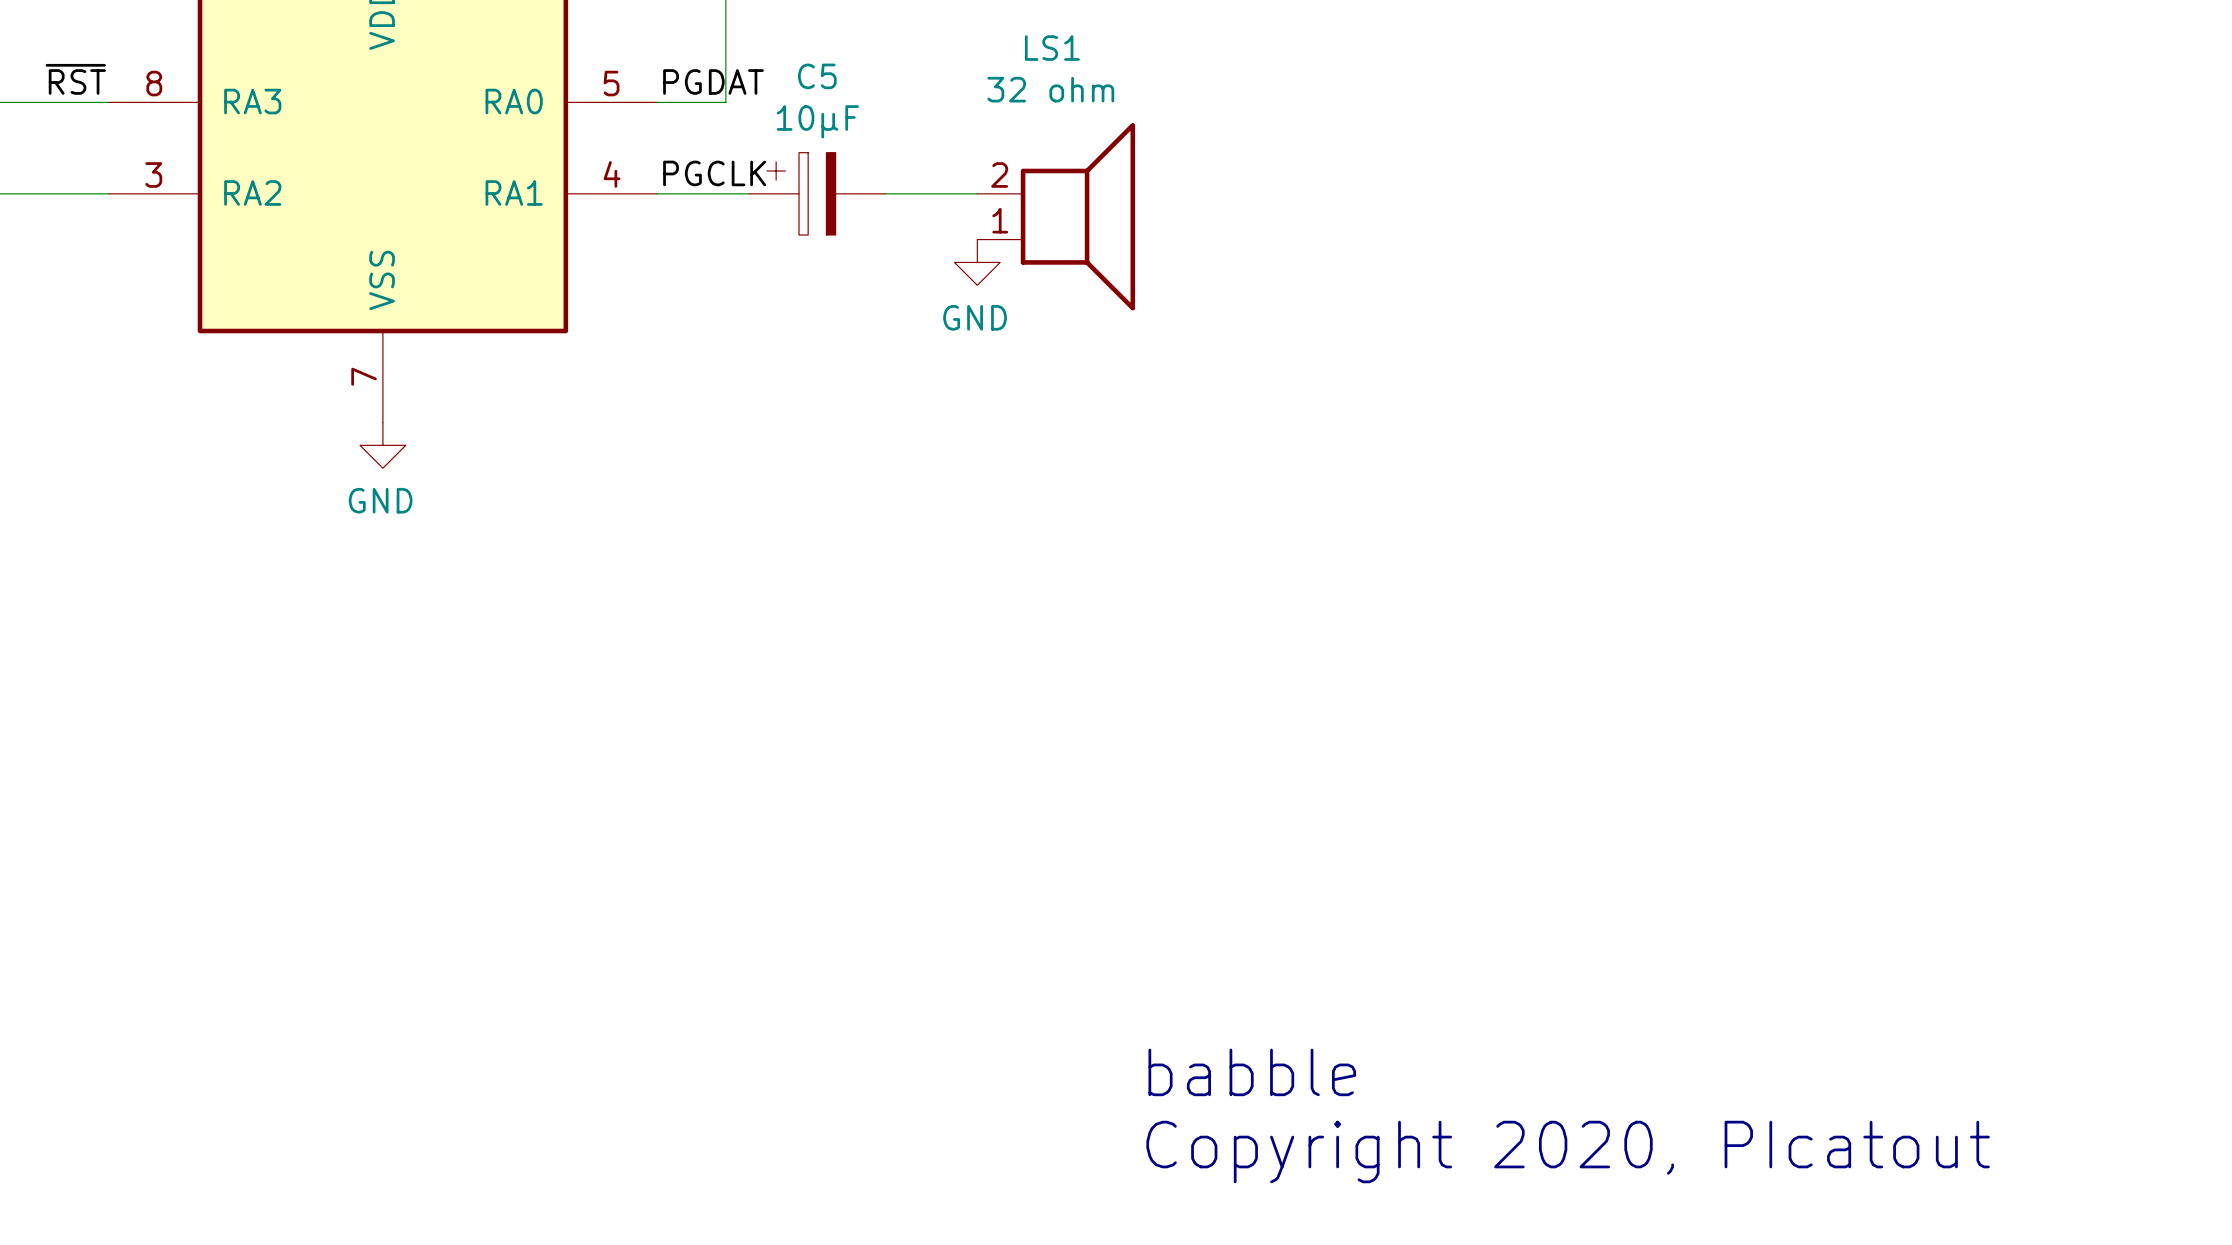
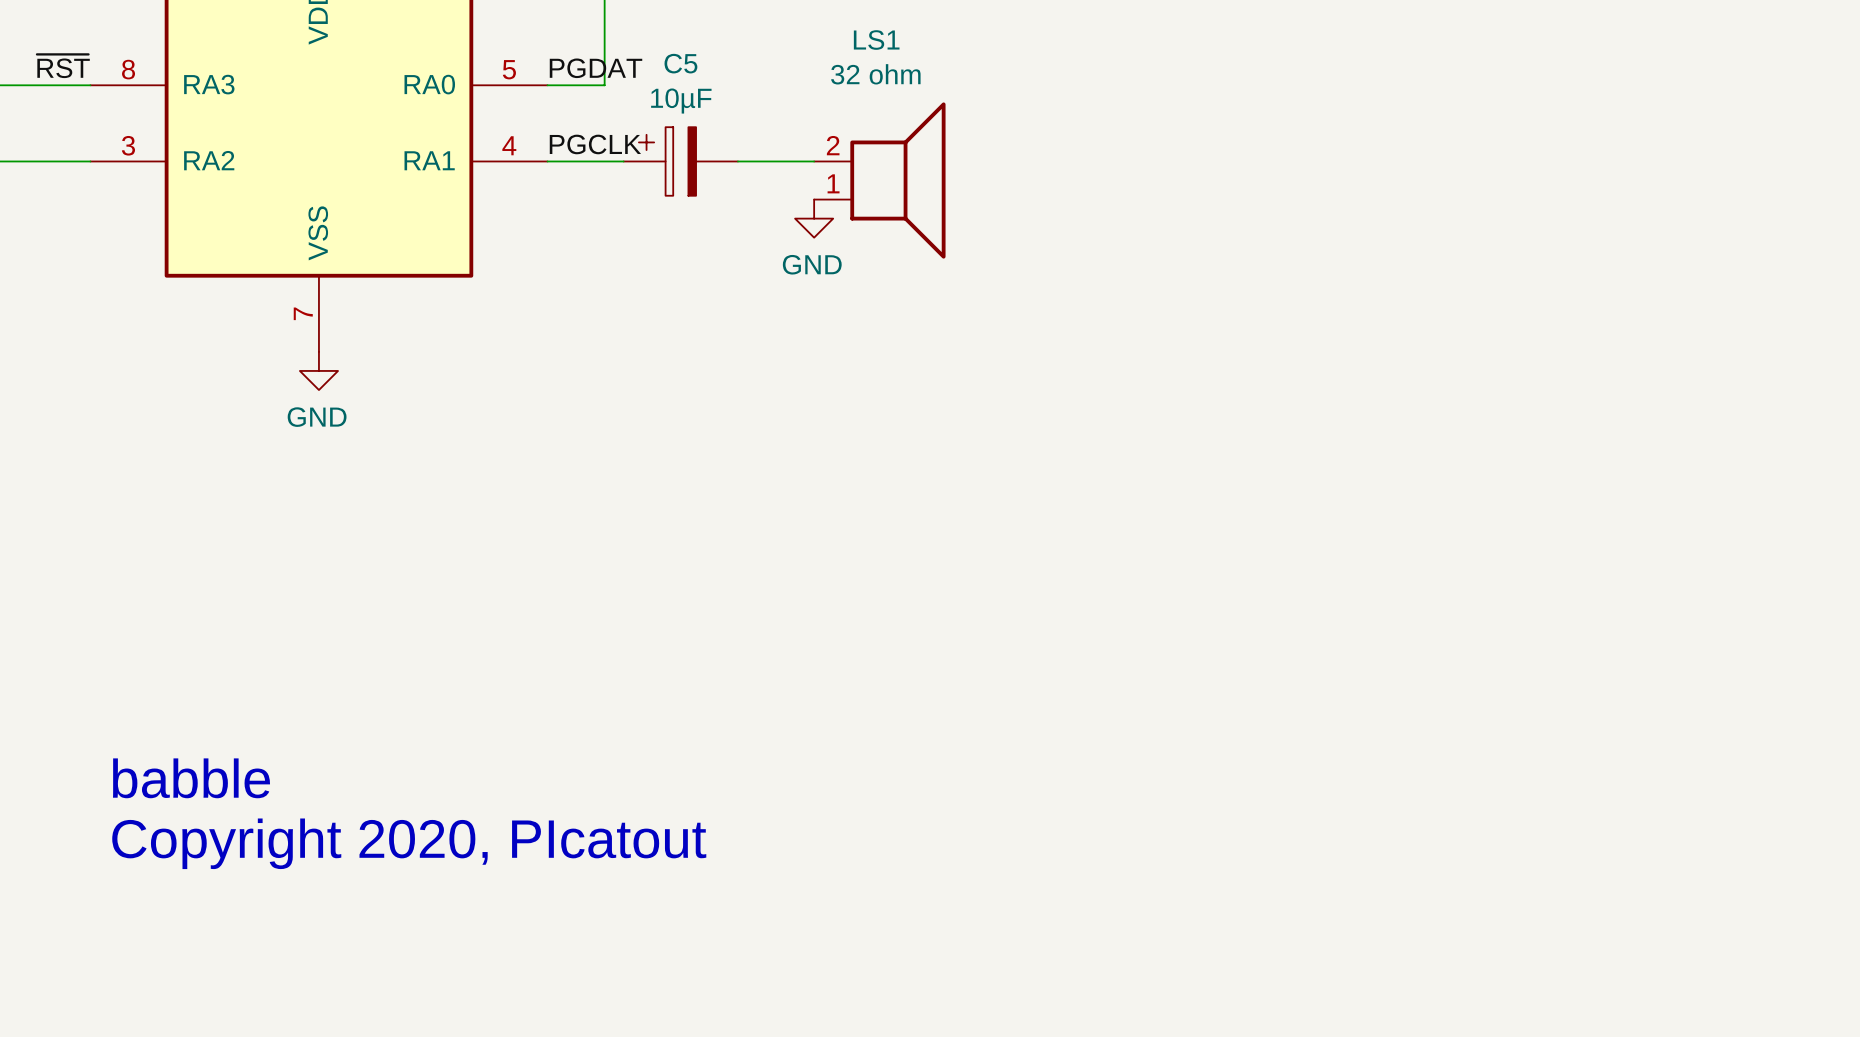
text: none -> babble (191, 778)
text: none -> Copyright 2020, PIcatout (409, 843)
text: babble (1252, 1072) -> none
text: Copyright 2020, PIcatout (1568, 1152) -> none

